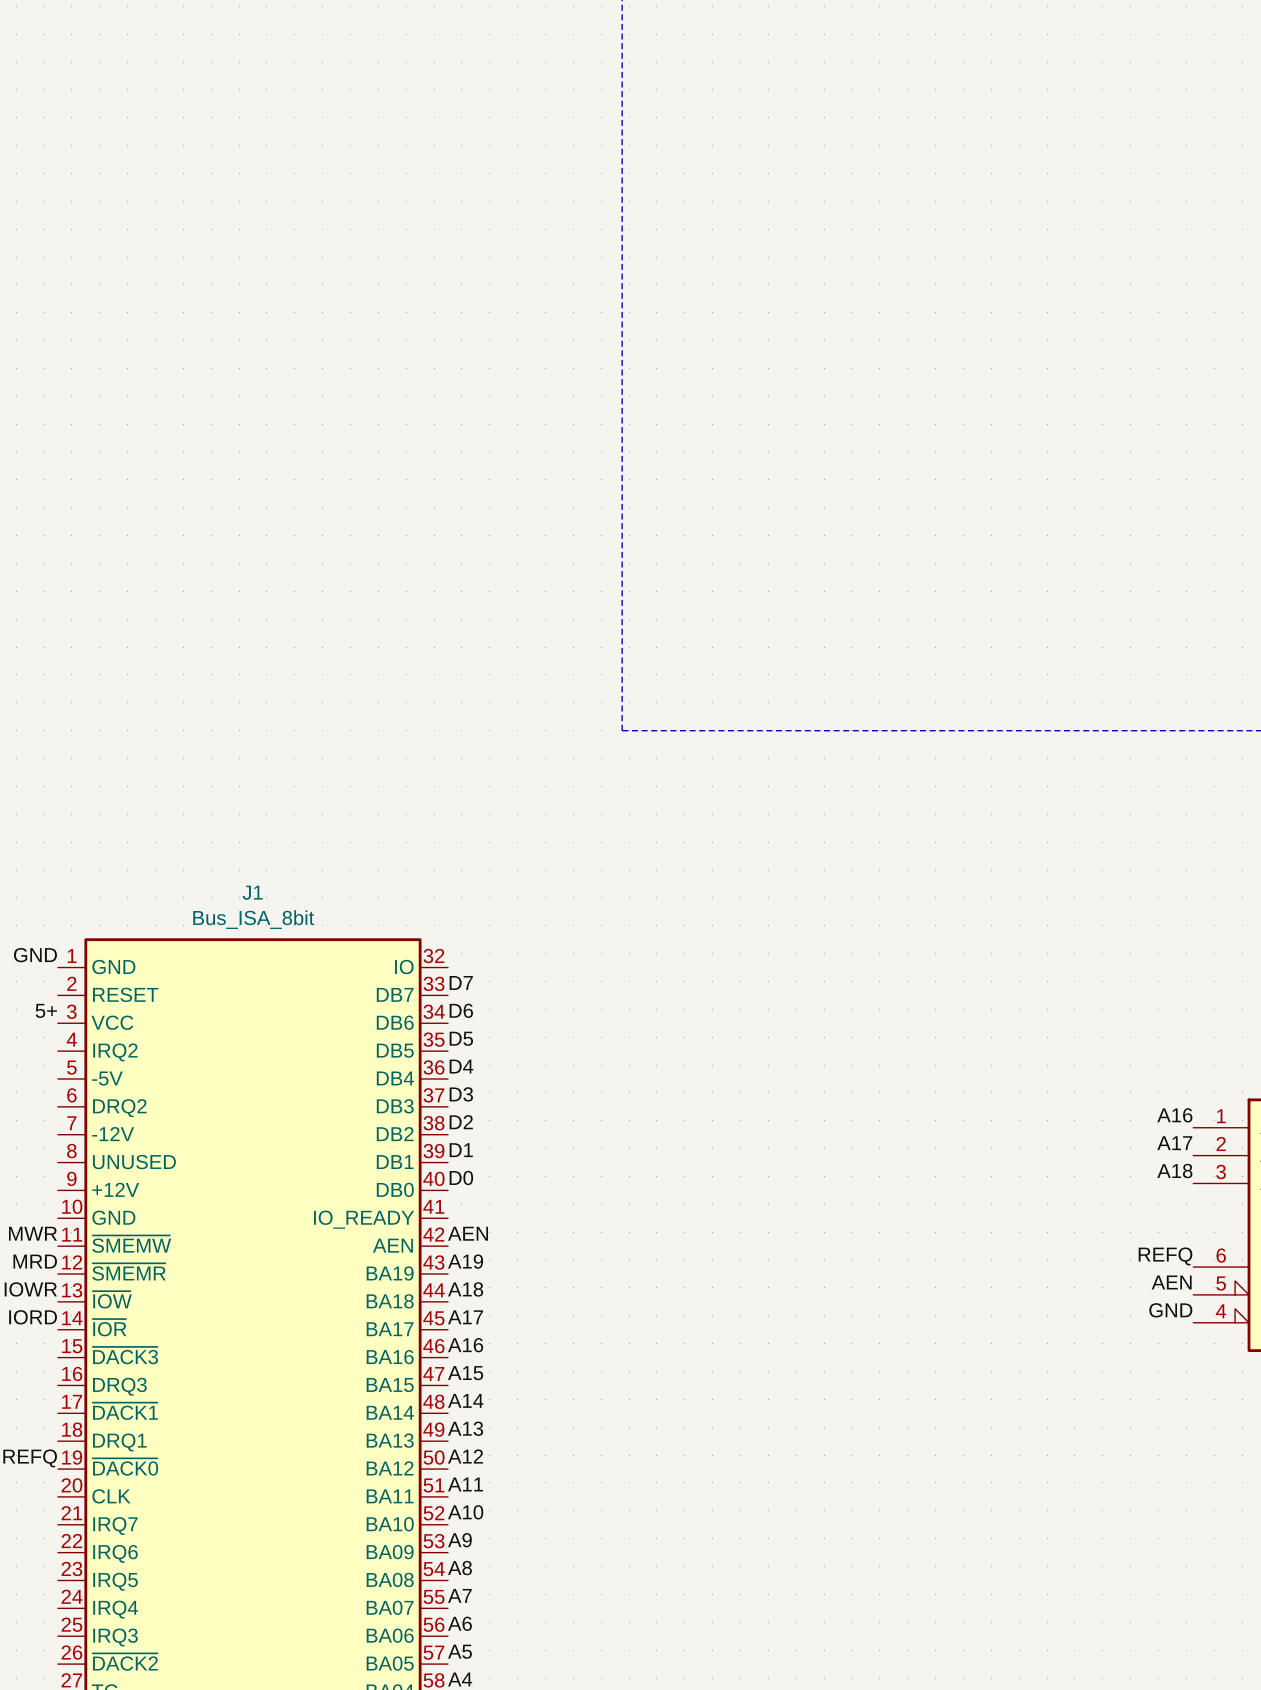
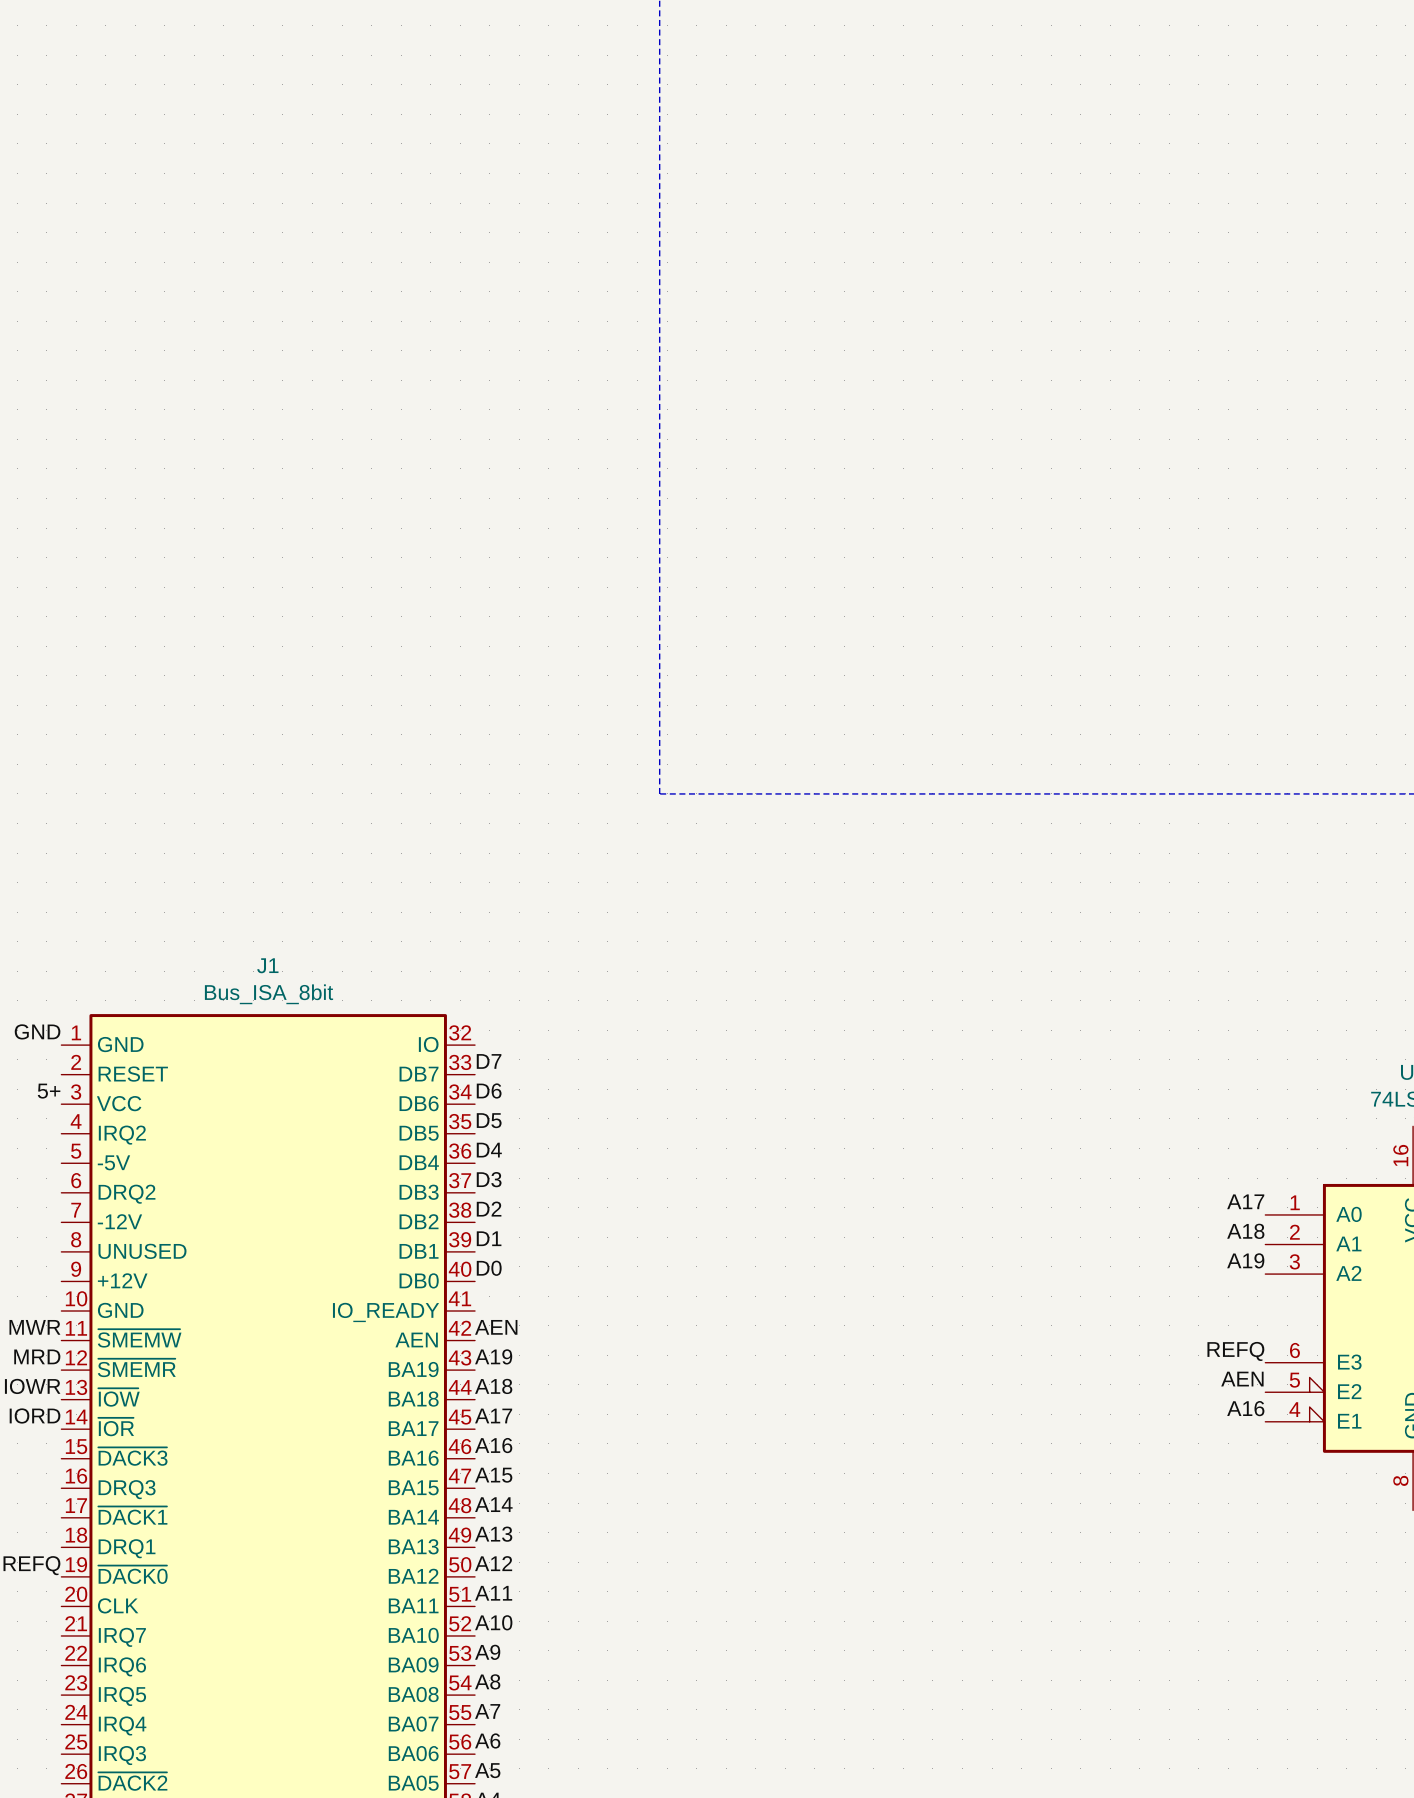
label: A16 (1174, 1115) -> A17 (1245, 1201)
label: A17 (1174, 1143) -> A18 (1245, 1231)
label: A18 (1174, 1171) -> A19 (1245, 1260)
label: GND (1170, 1310) -> A16 (1245, 1408)

